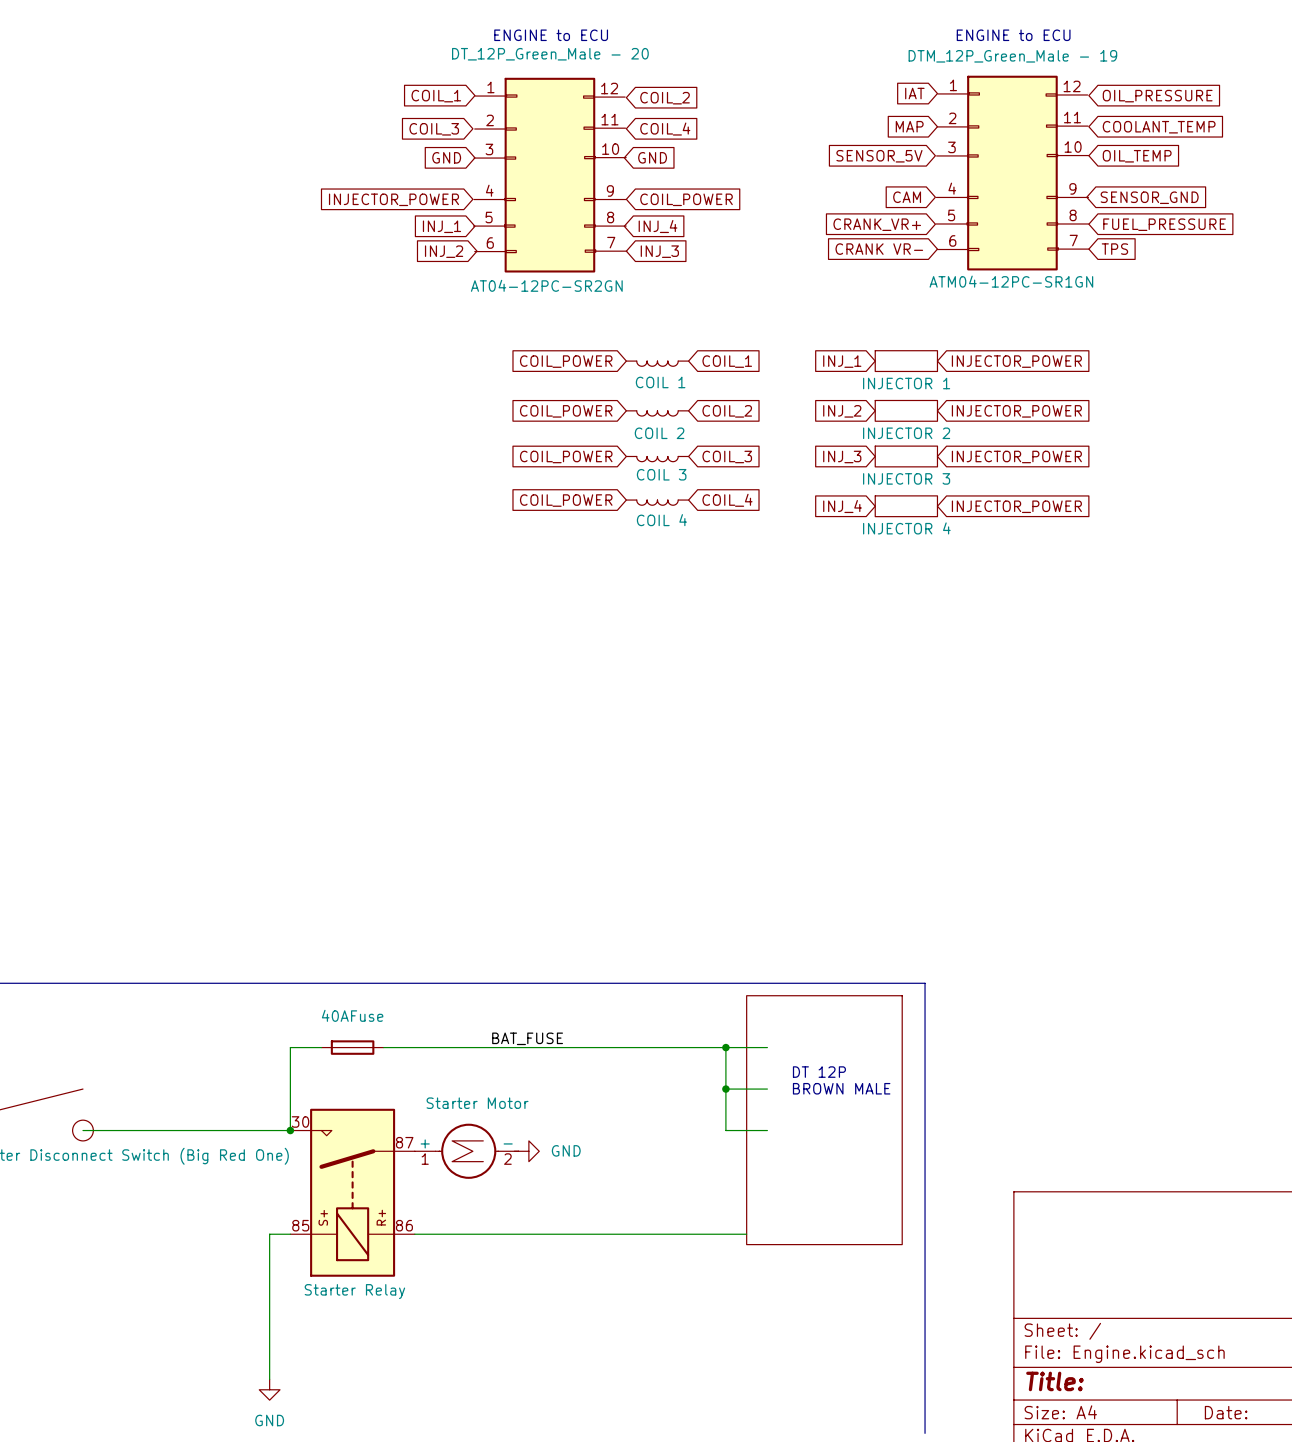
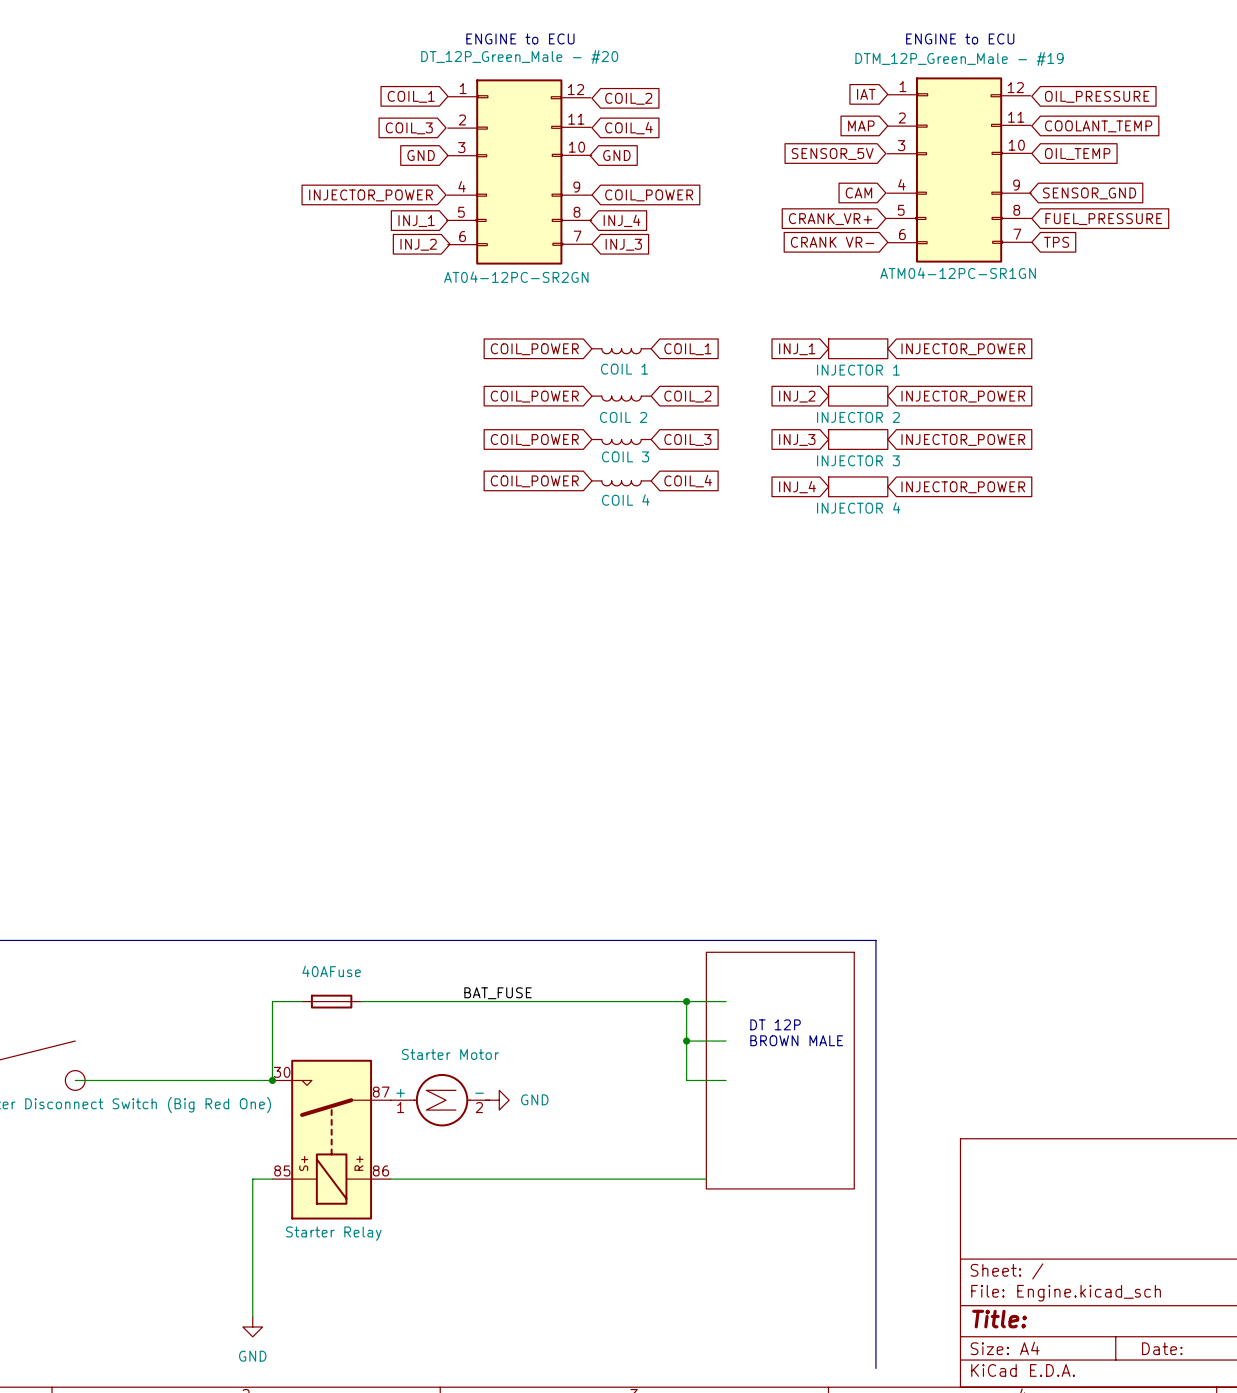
part value: DT_12P_Green_Male - 20 (550, 54) -> DT_12P_Green_Male - #20 (519, 57)
part value: DTM_12P_Green_Male - 19 (1012, 56) -> DTM_12P_Green_Male - #19 (959, 58)

